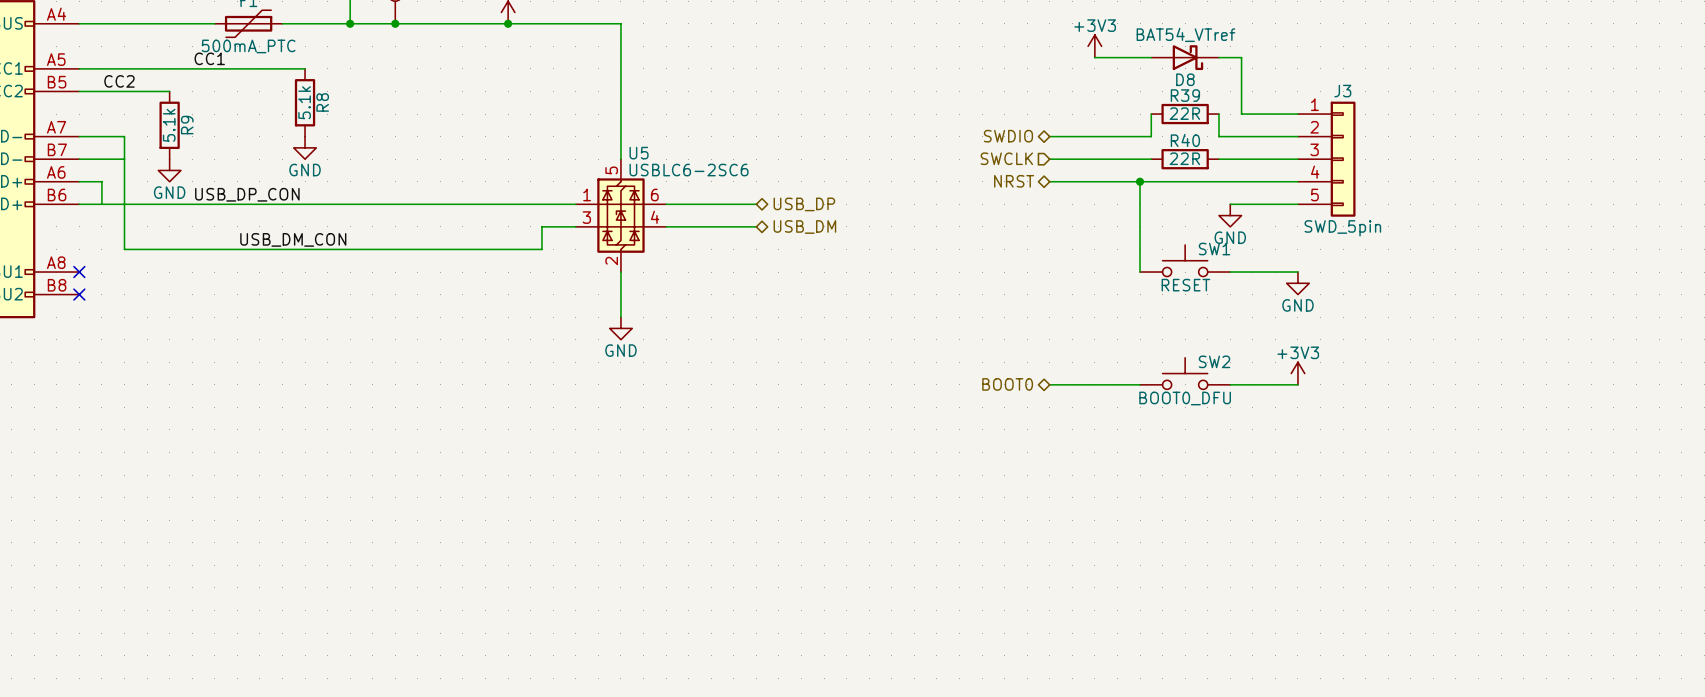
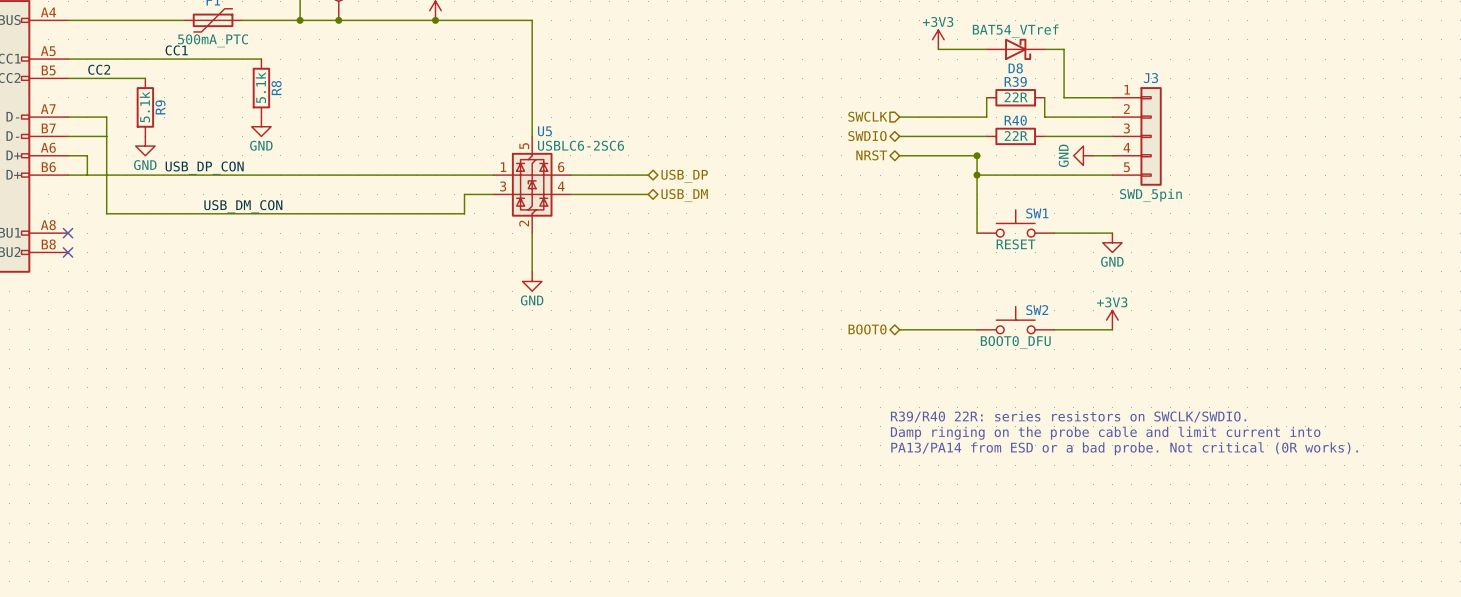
hierarchical label shape: bidirectional (1008, 136) -> input (867, 116)
hierarchical label: SWDIO (1008, 136) -> SWCLK (867, 116)
hierarchical label shape: input (1006, 158) -> bidirectional (867, 136)
hierarchical label: SWCLK (1006, 158) -> SWDIO (867, 136)
wire: (1140, 181) (1275, 181) -> none
wire: none -> (977, 175) (1054, 175)
junction: none -> (977, 175)
power symbol rotation: 0° (1230, 215) -> 90° clockwise (1083, 155)
power symbol position: GND (1230, 215) -> GND (1083, 155)
text: none -> R39/R40 22R: series resistors on SWCLK/SWDIO. (1068, 416)
text: none -> Damp ringing on the probe cable and limit current into (1105, 433)
text: none -> PA13/PA14 from ESD or a bad probe. Not critical (0R works). (1124, 448)

